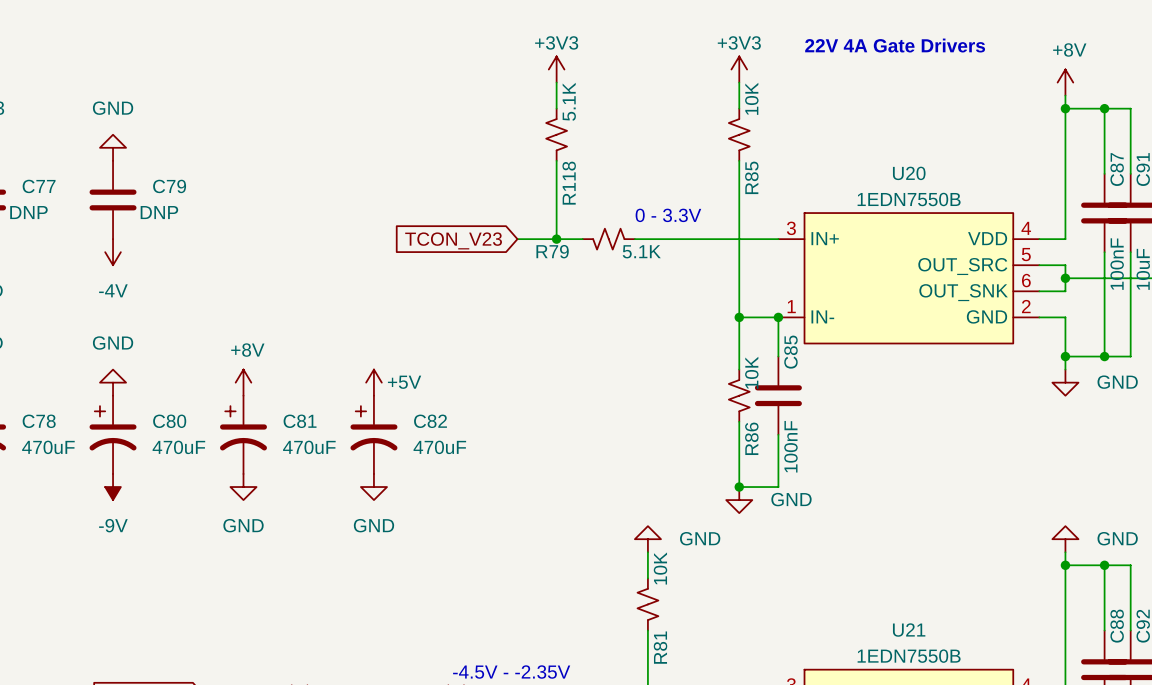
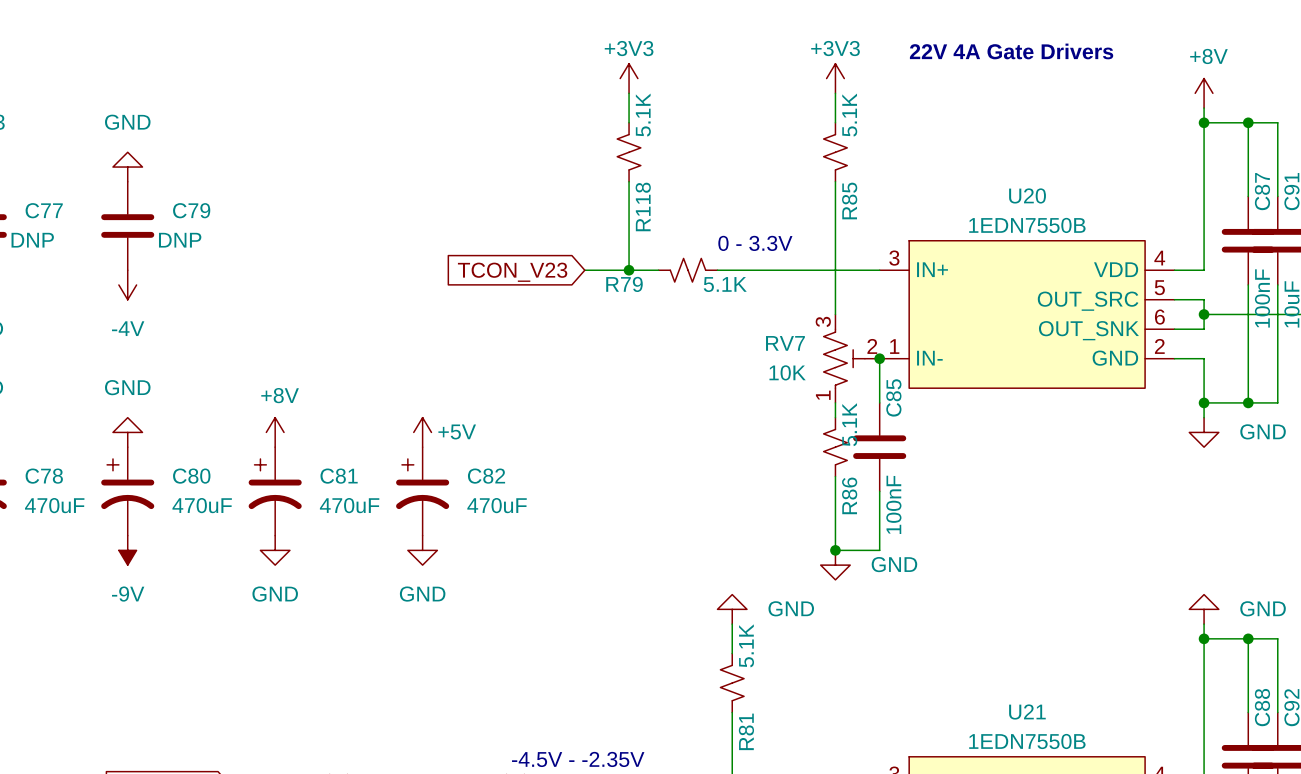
R85 value: 10K (751, 98) -> 5.1K (849, 115)
junction: (739, 317) -> none
RV7: none -> 10K (851, 358)
R86 value: 10K (751, 372) -> 5.1K (849, 424)
R81 value: 10K (660, 568) -> 5.1K (746, 645)

